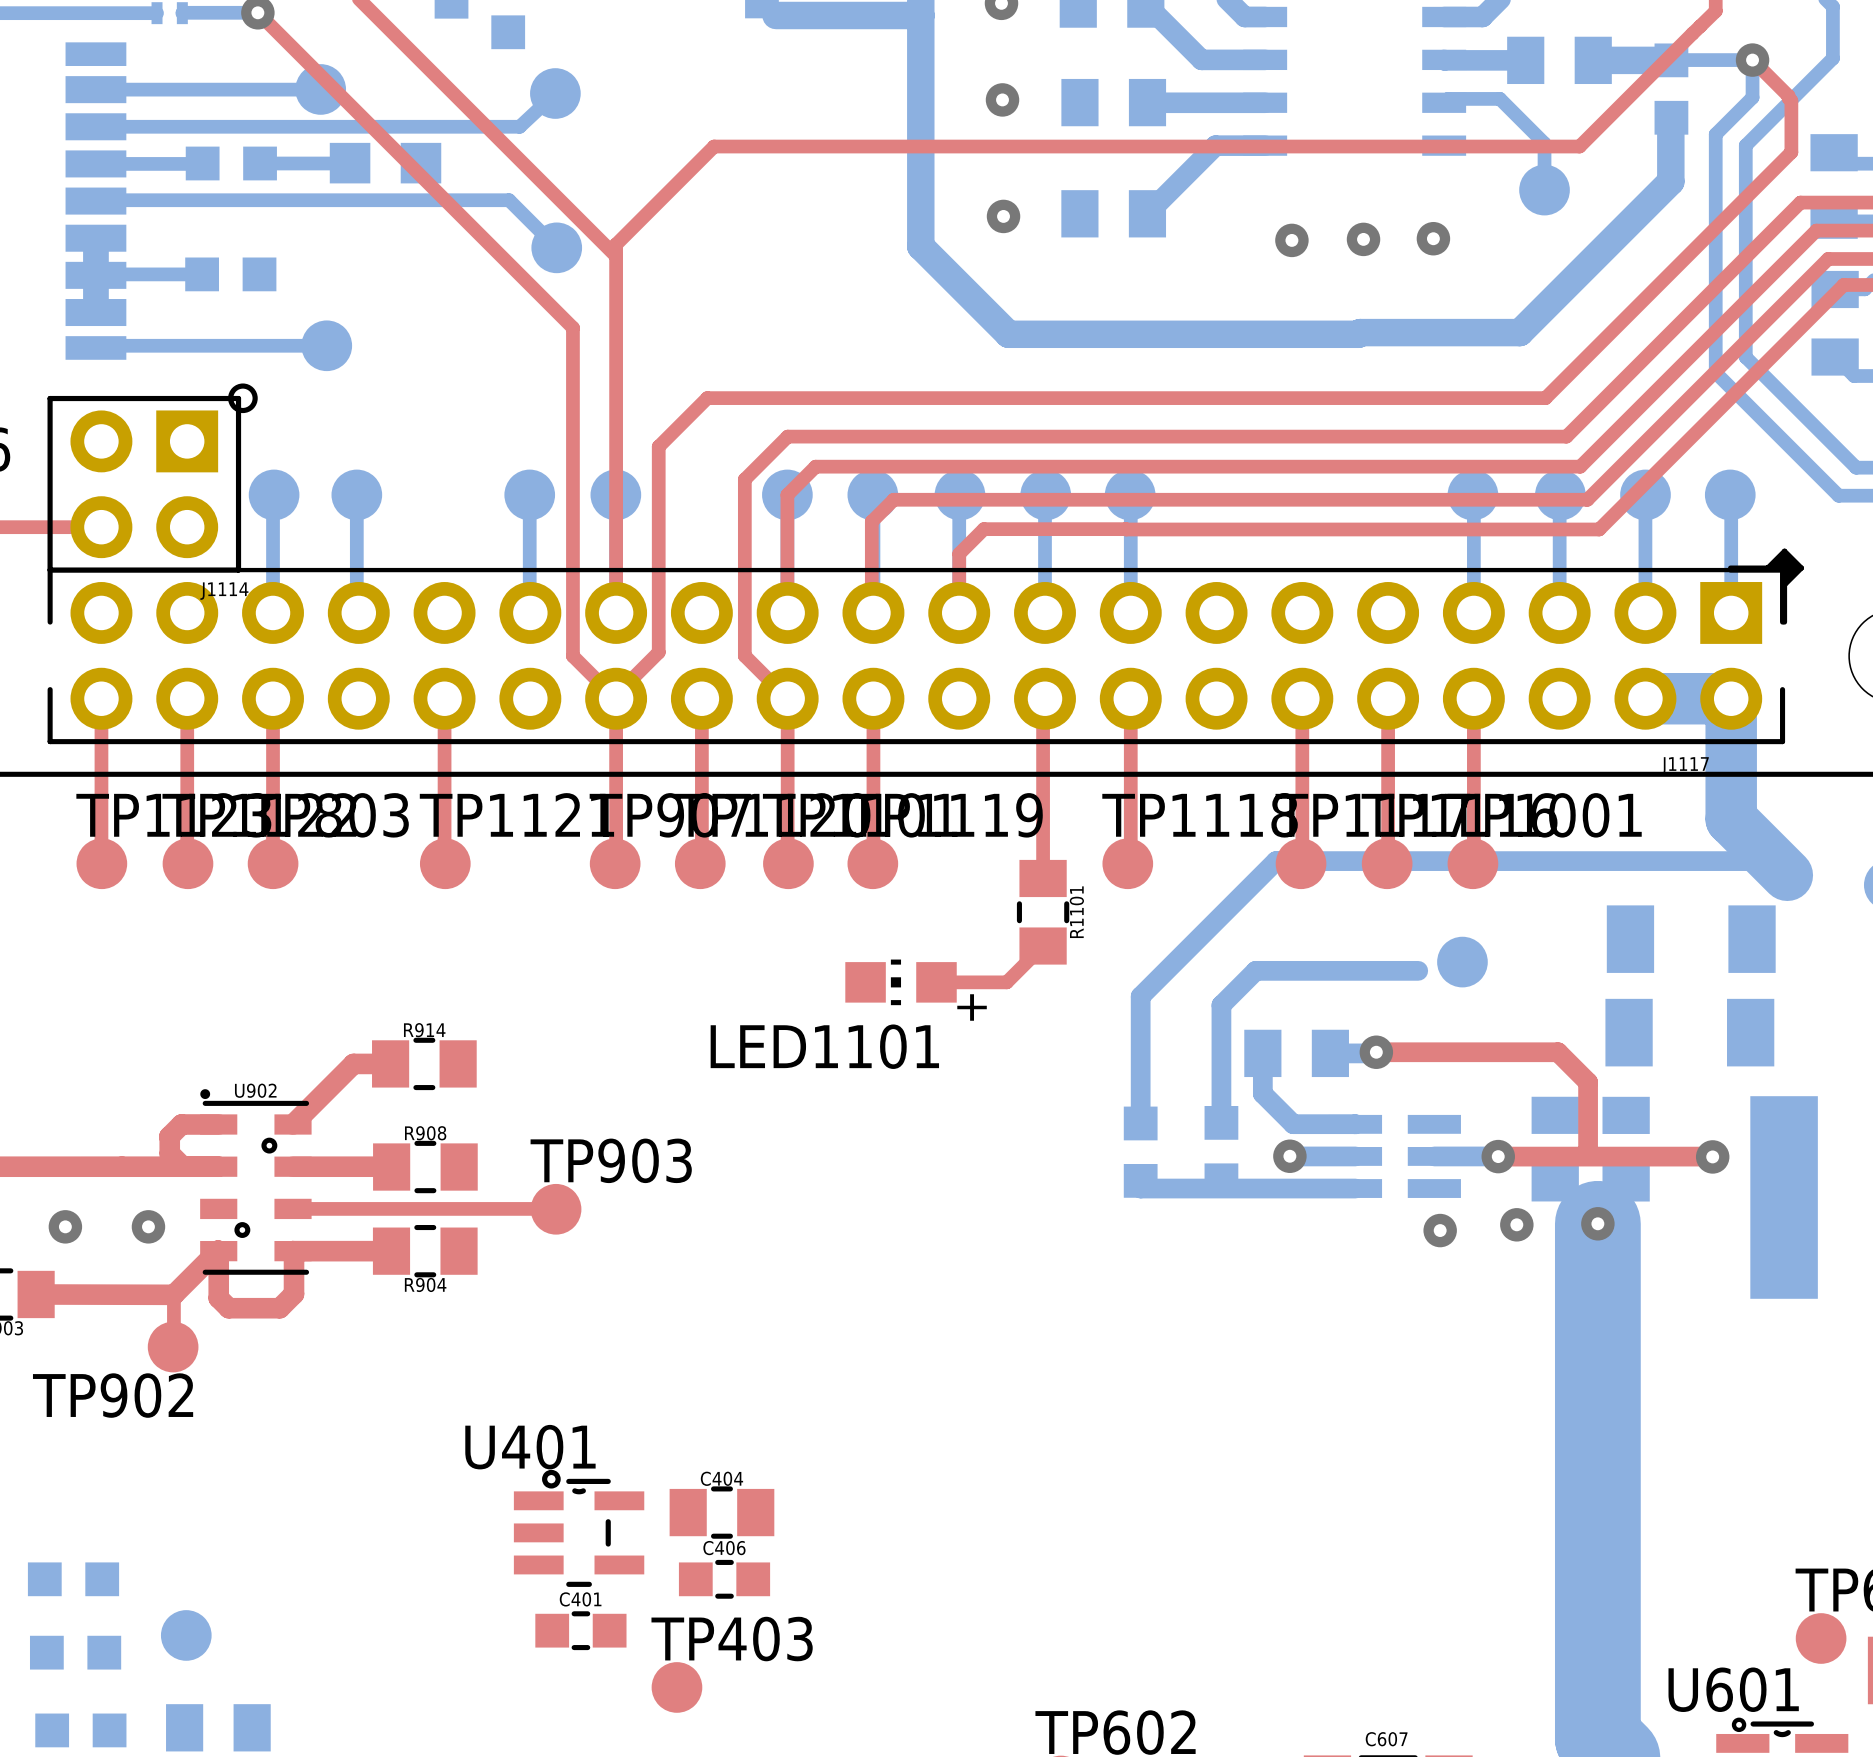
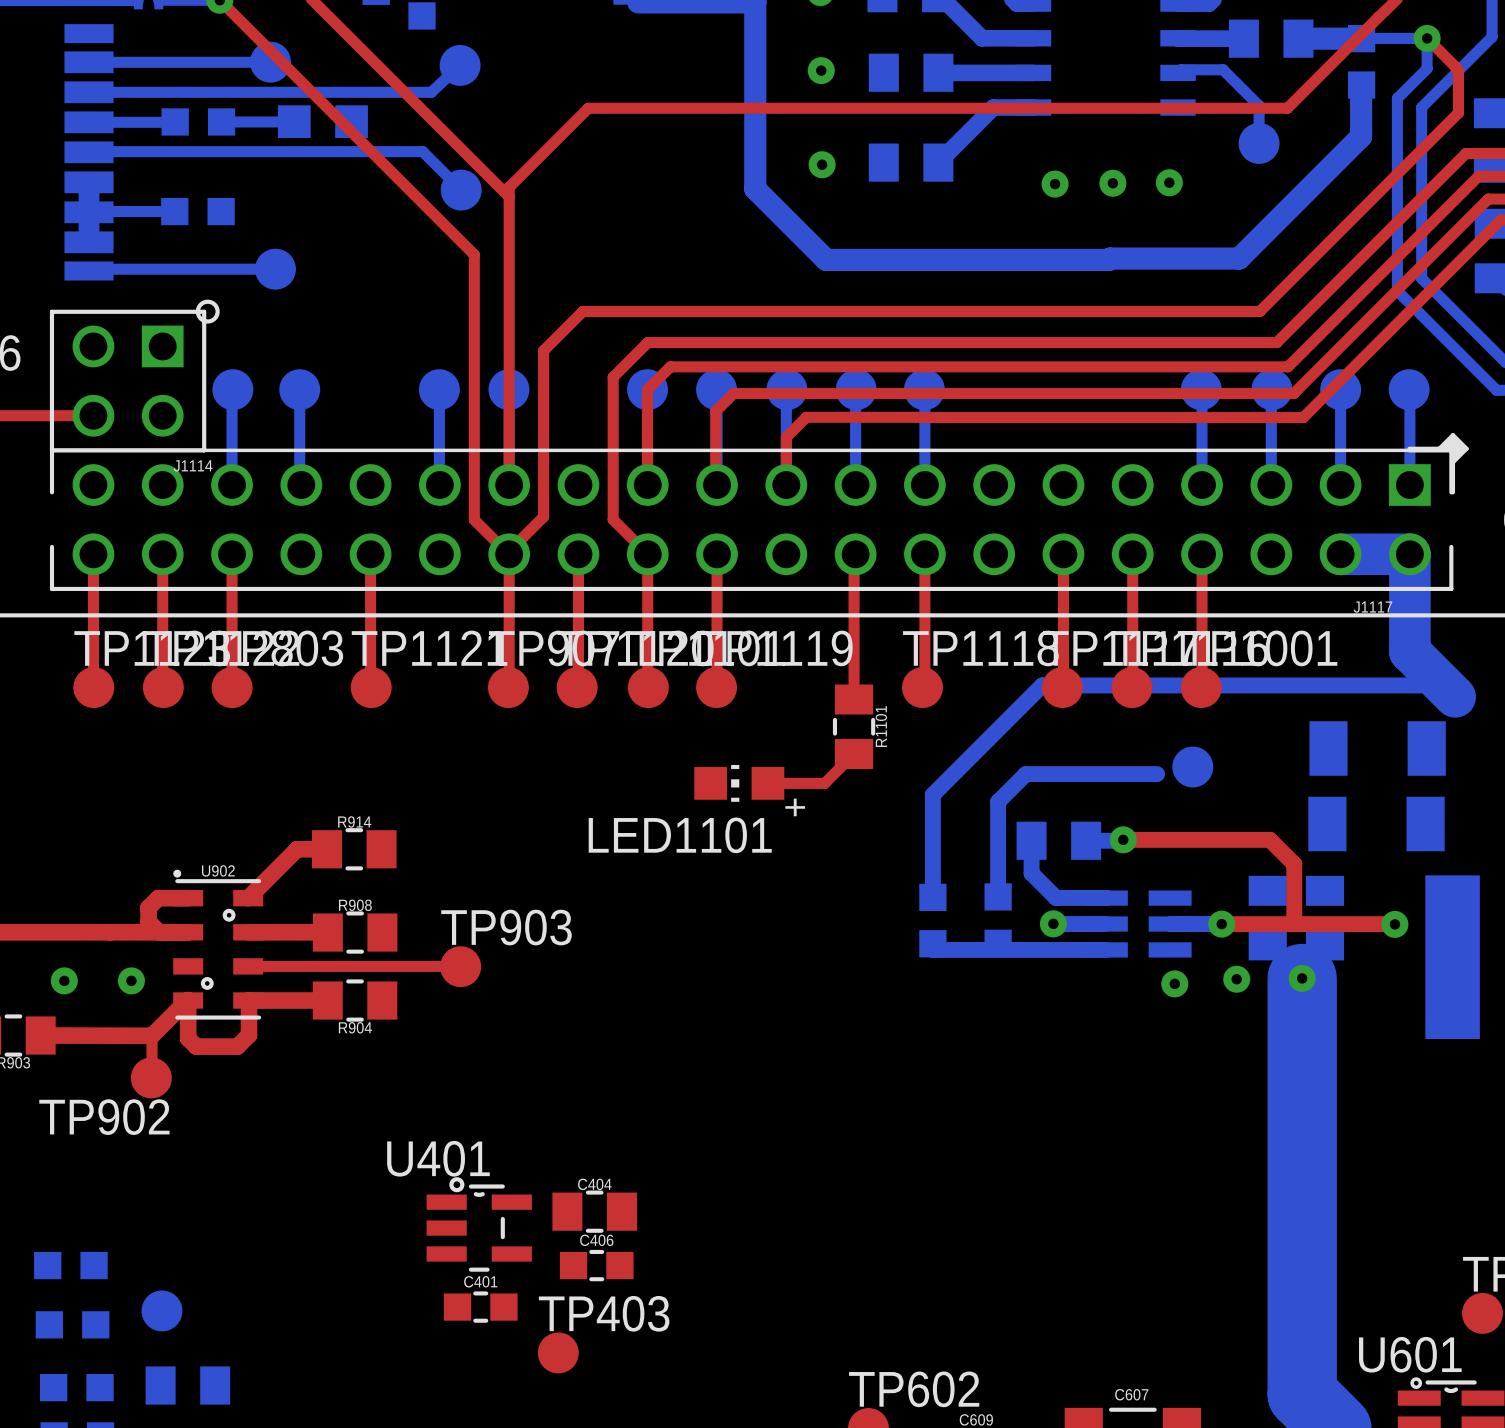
J1114 footprint: [47, 383, 258, 573] -> [49, 299, 220, 453]
J1117 footprint: [47, 548, 1804, 745] -> [49, 433, 1469, 591]

